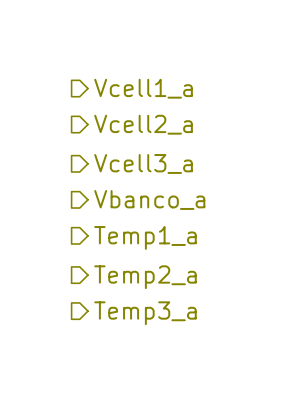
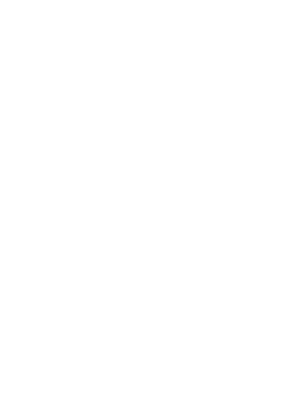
hierarchical label: Vcell1_a (143, 88) -> none
hierarchical label: Vcell2_a (143, 124) -> none
hierarchical label: Vcell3_a (143, 163) -> none
hierarchical label: Vbanco_a (149, 199) -> none
hierarchical label: Temp1_a (145, 237) -> none
hierarchical label: Temp2_a (145, 277) -> none
hierarchical label: Temp3_a (145, 313) -> none

